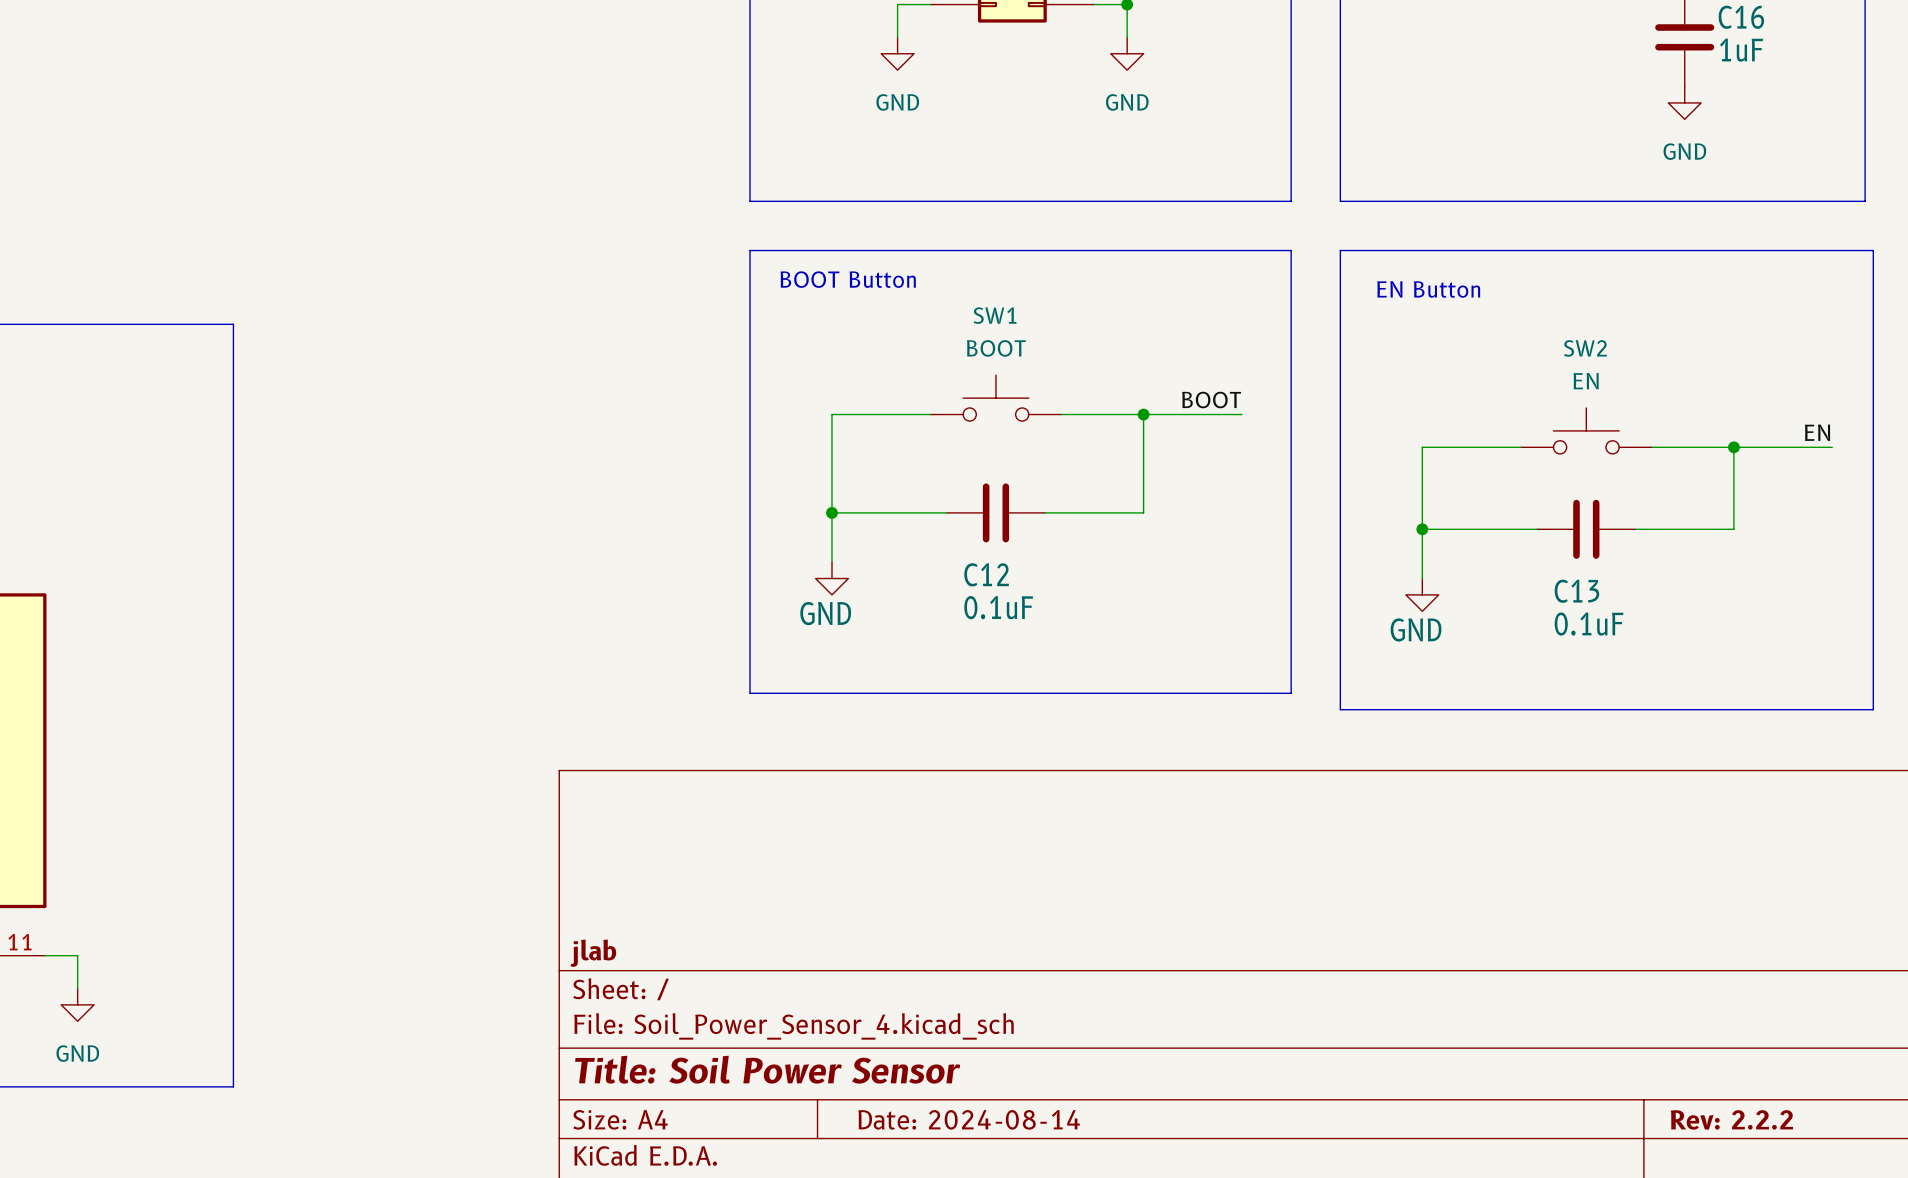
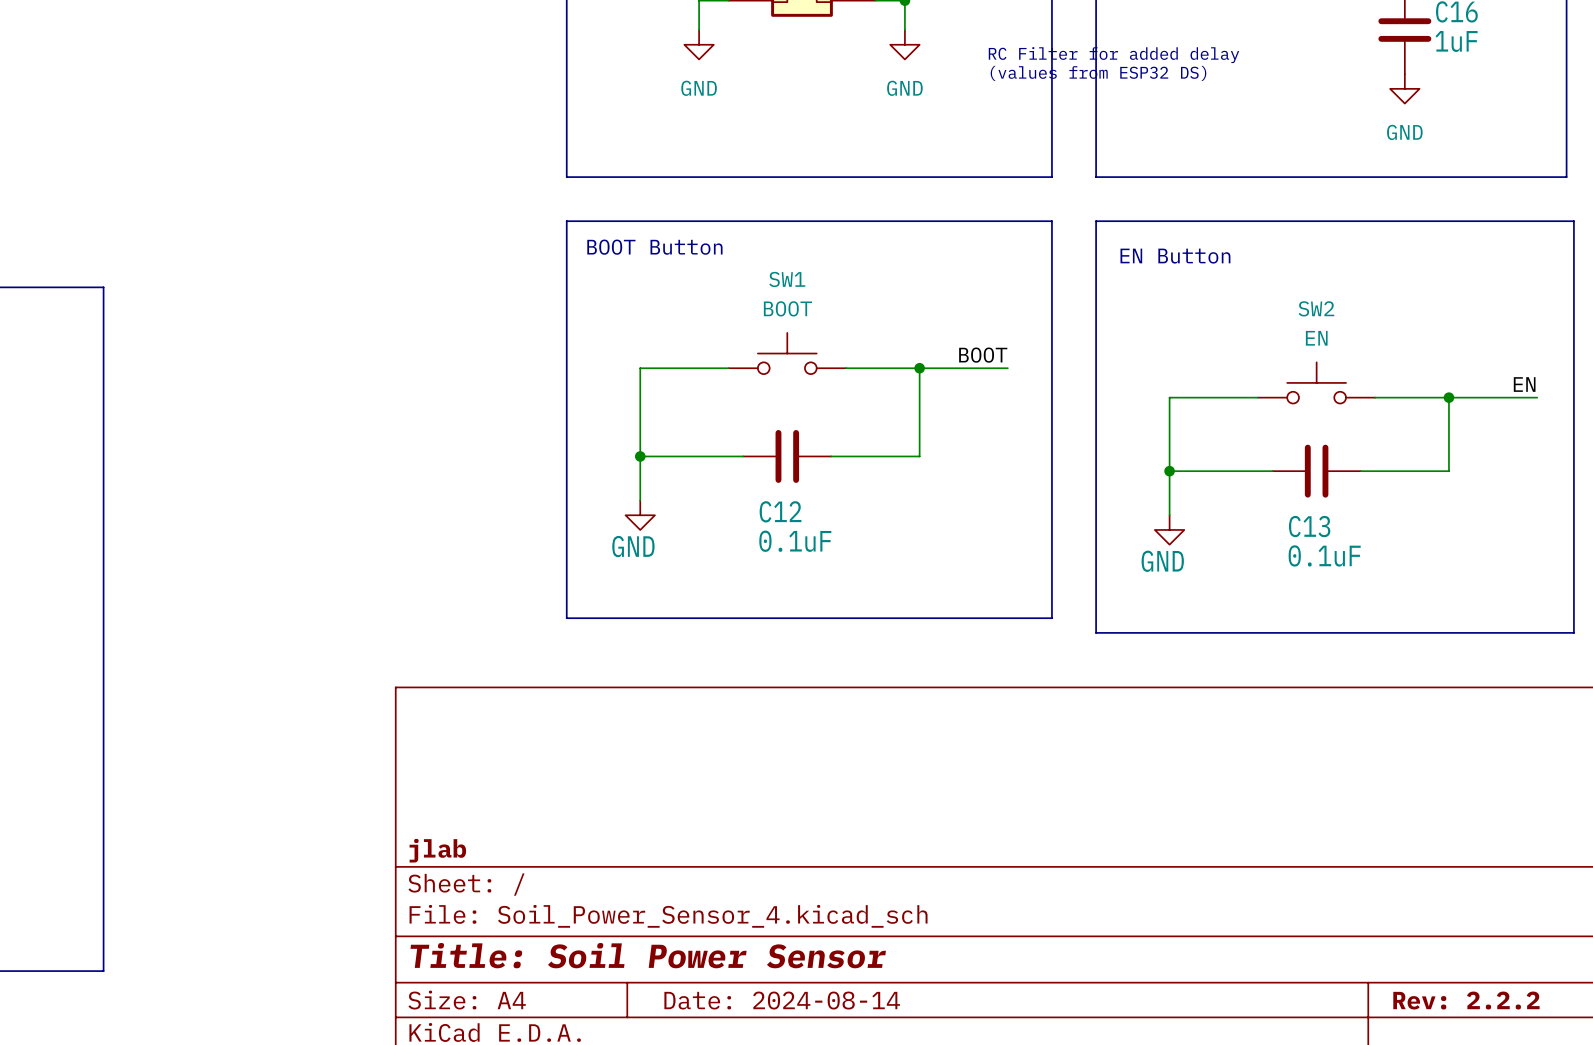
text: none -> RC Filter for added delay (1113, 55)
text: none -> (values from ESP32 DS) (1098, 73)

